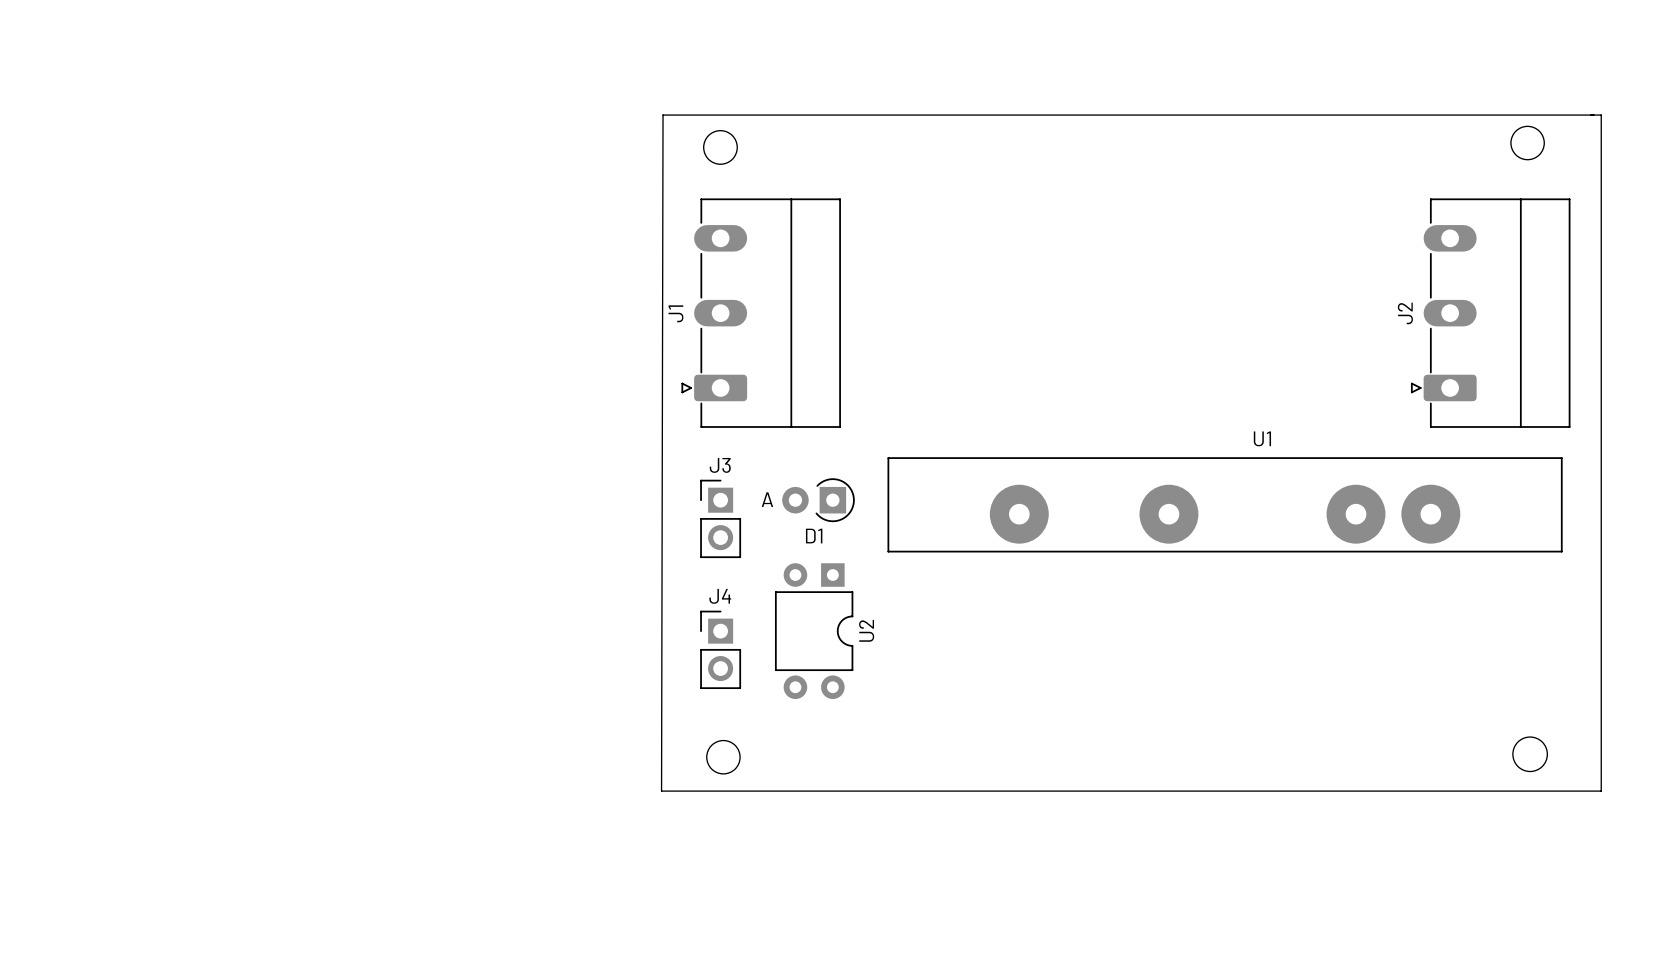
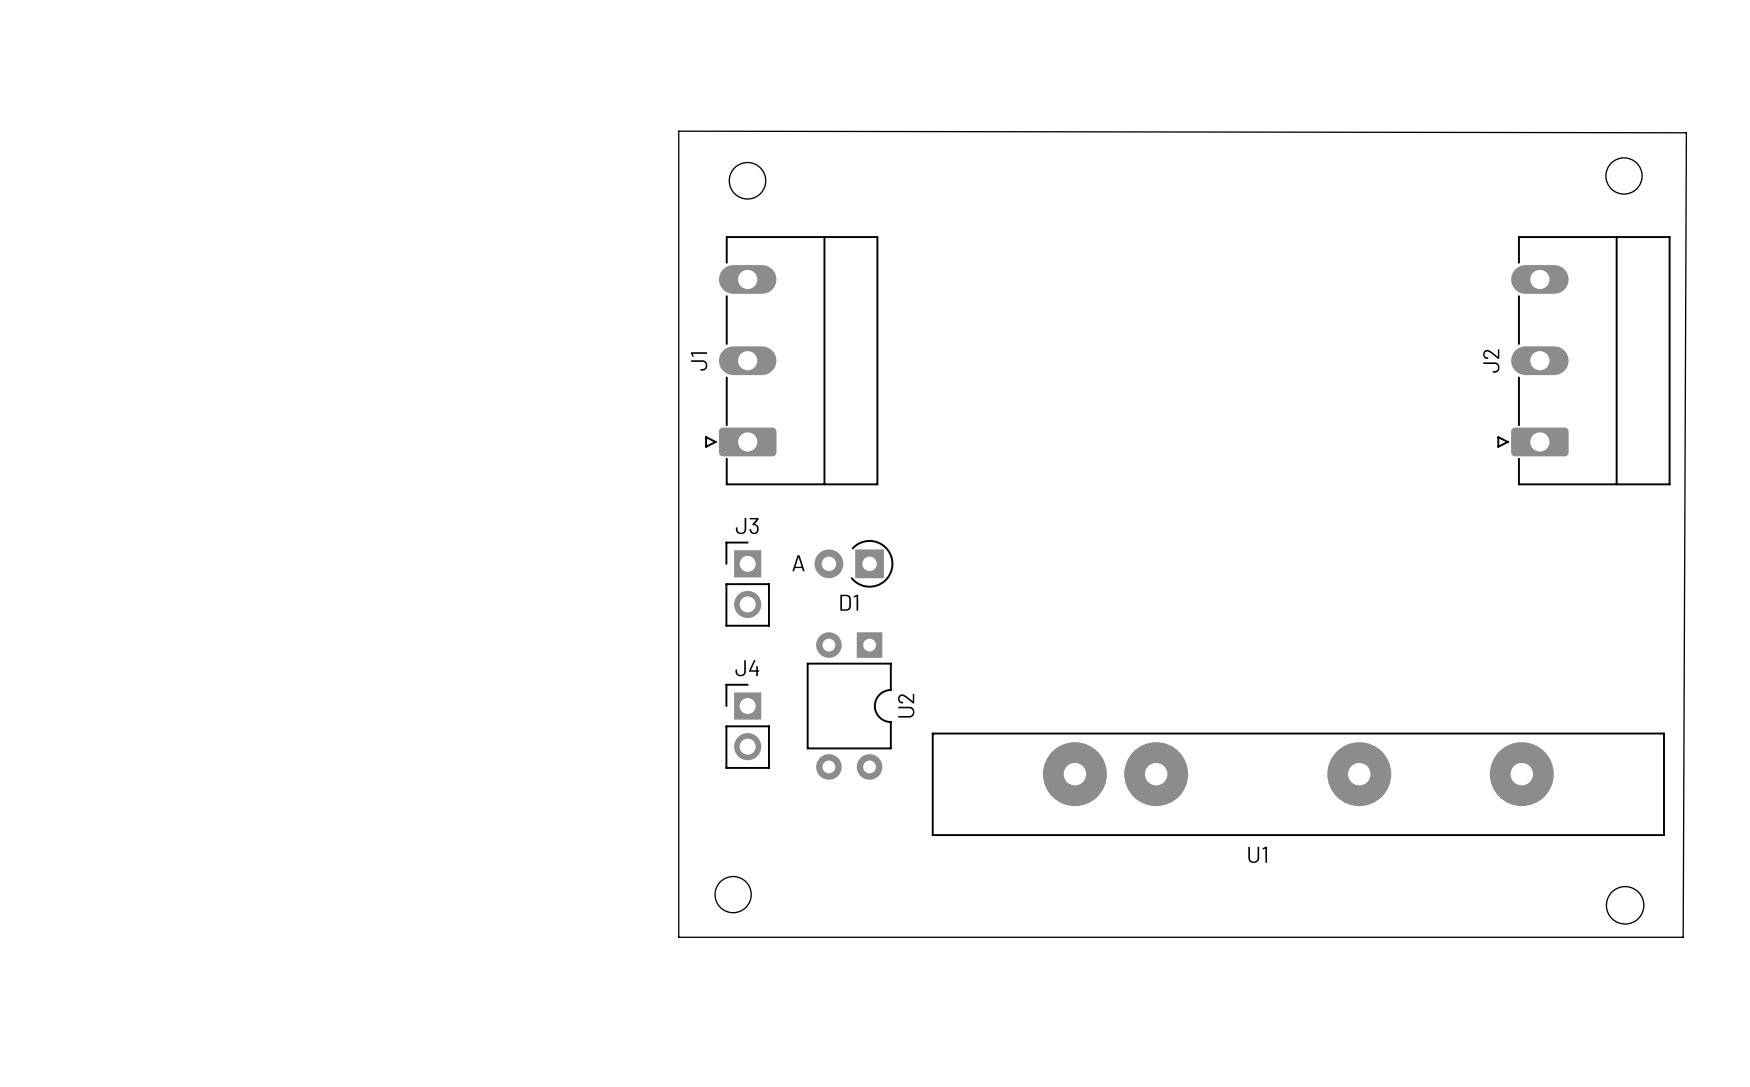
board edge: (663, 115) (1601, 115) (1601, 791) (661, 791) (663, 115) -> (678, 131) (678, 937) (1683, 937) (1686, 132) (678, 131)
U1 rotation: 0° (1225, 504) -> 180° (1298, 784)
round board edge position: (1530, 754) -> (1625, 905)
round board edge position: (723, 757) -> (733, 894)

